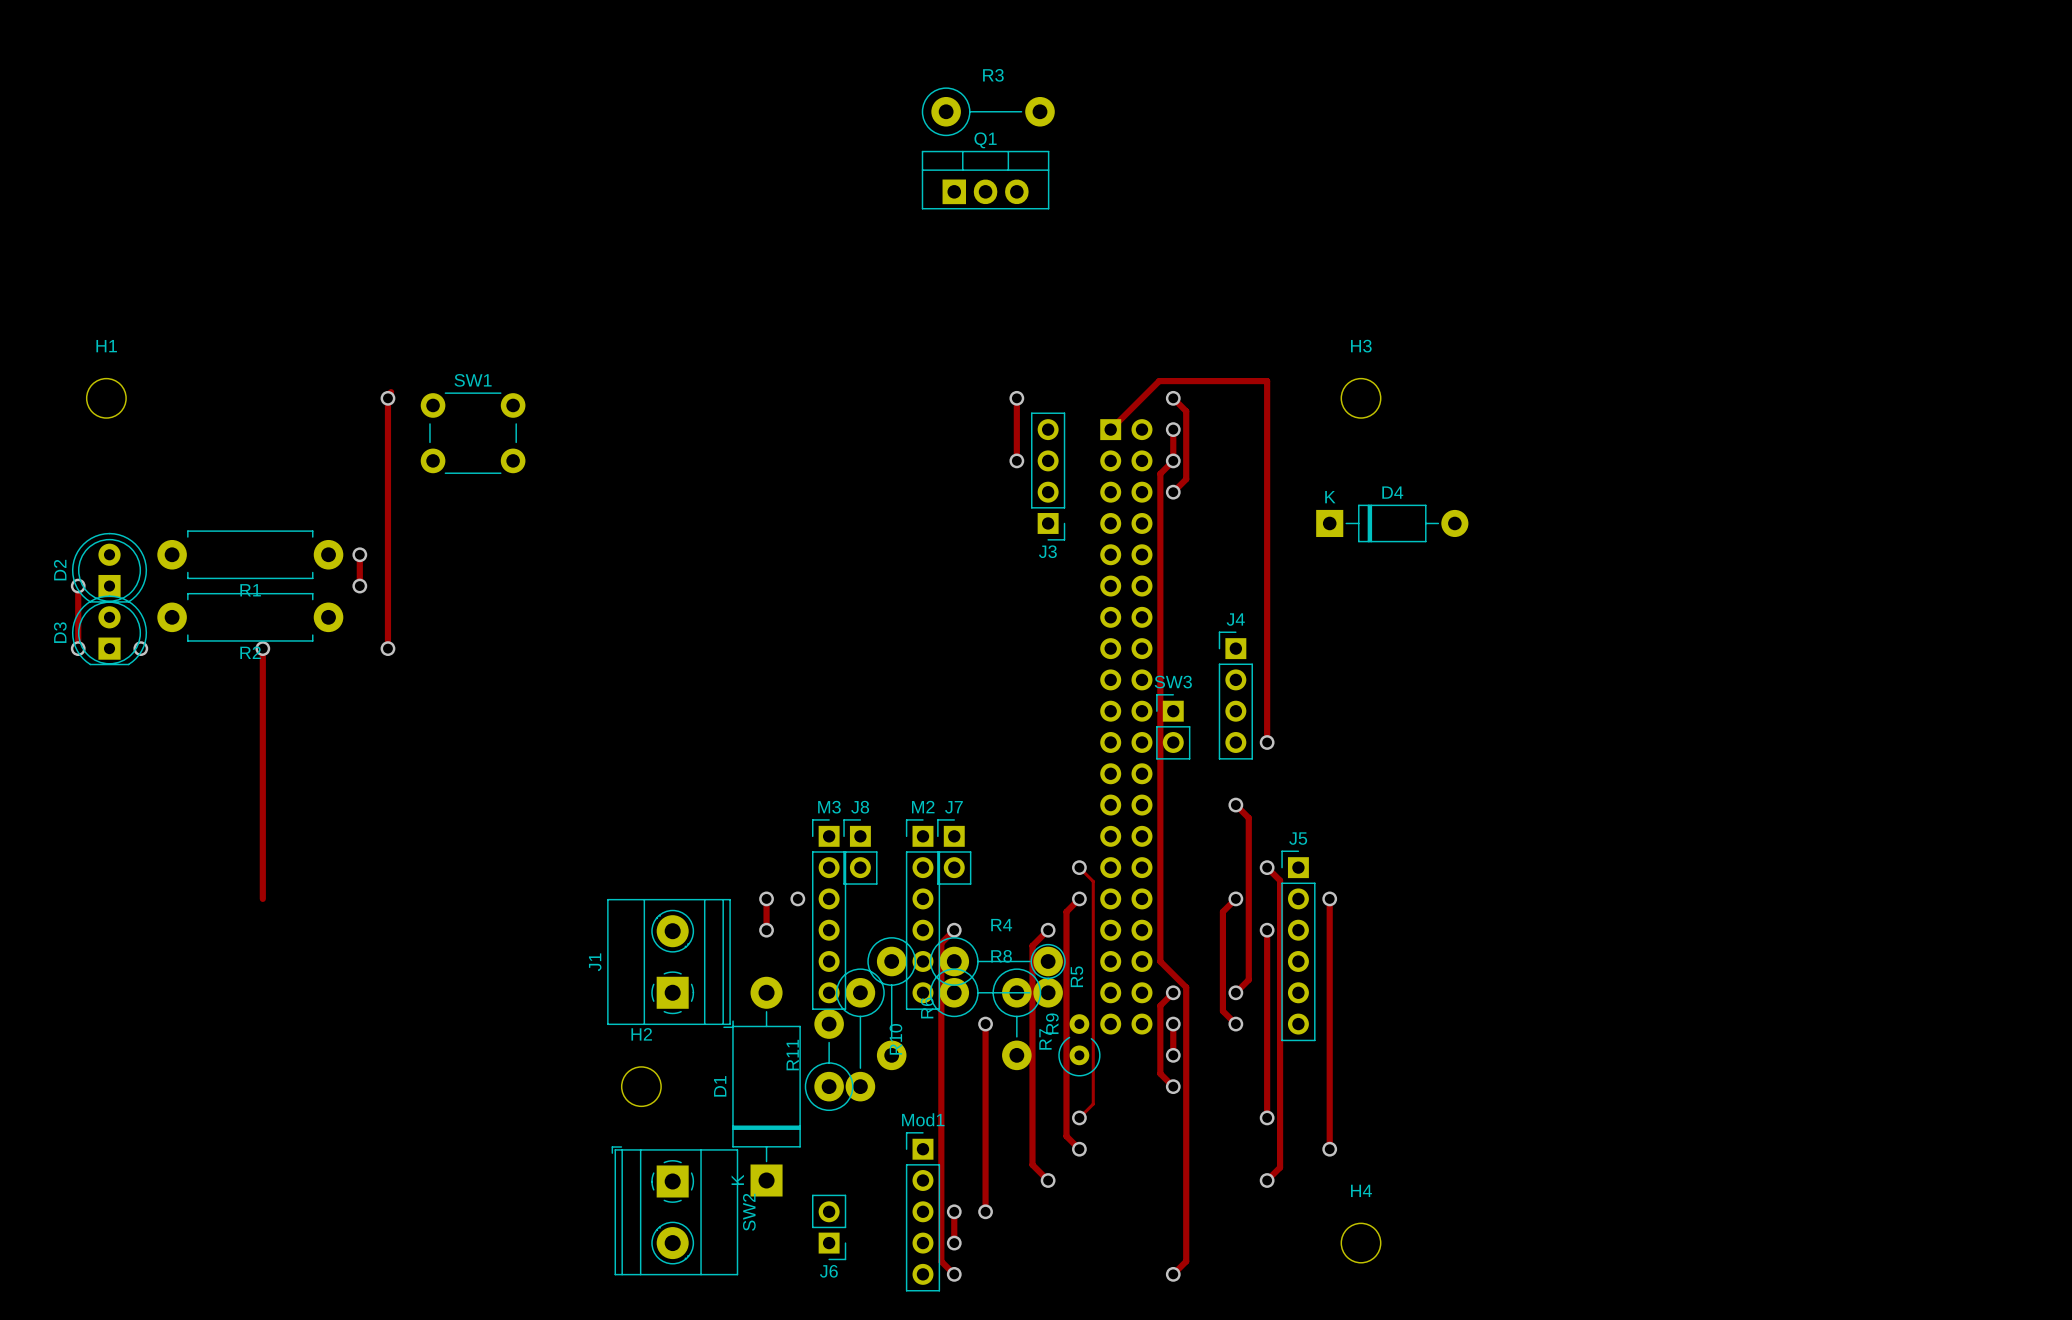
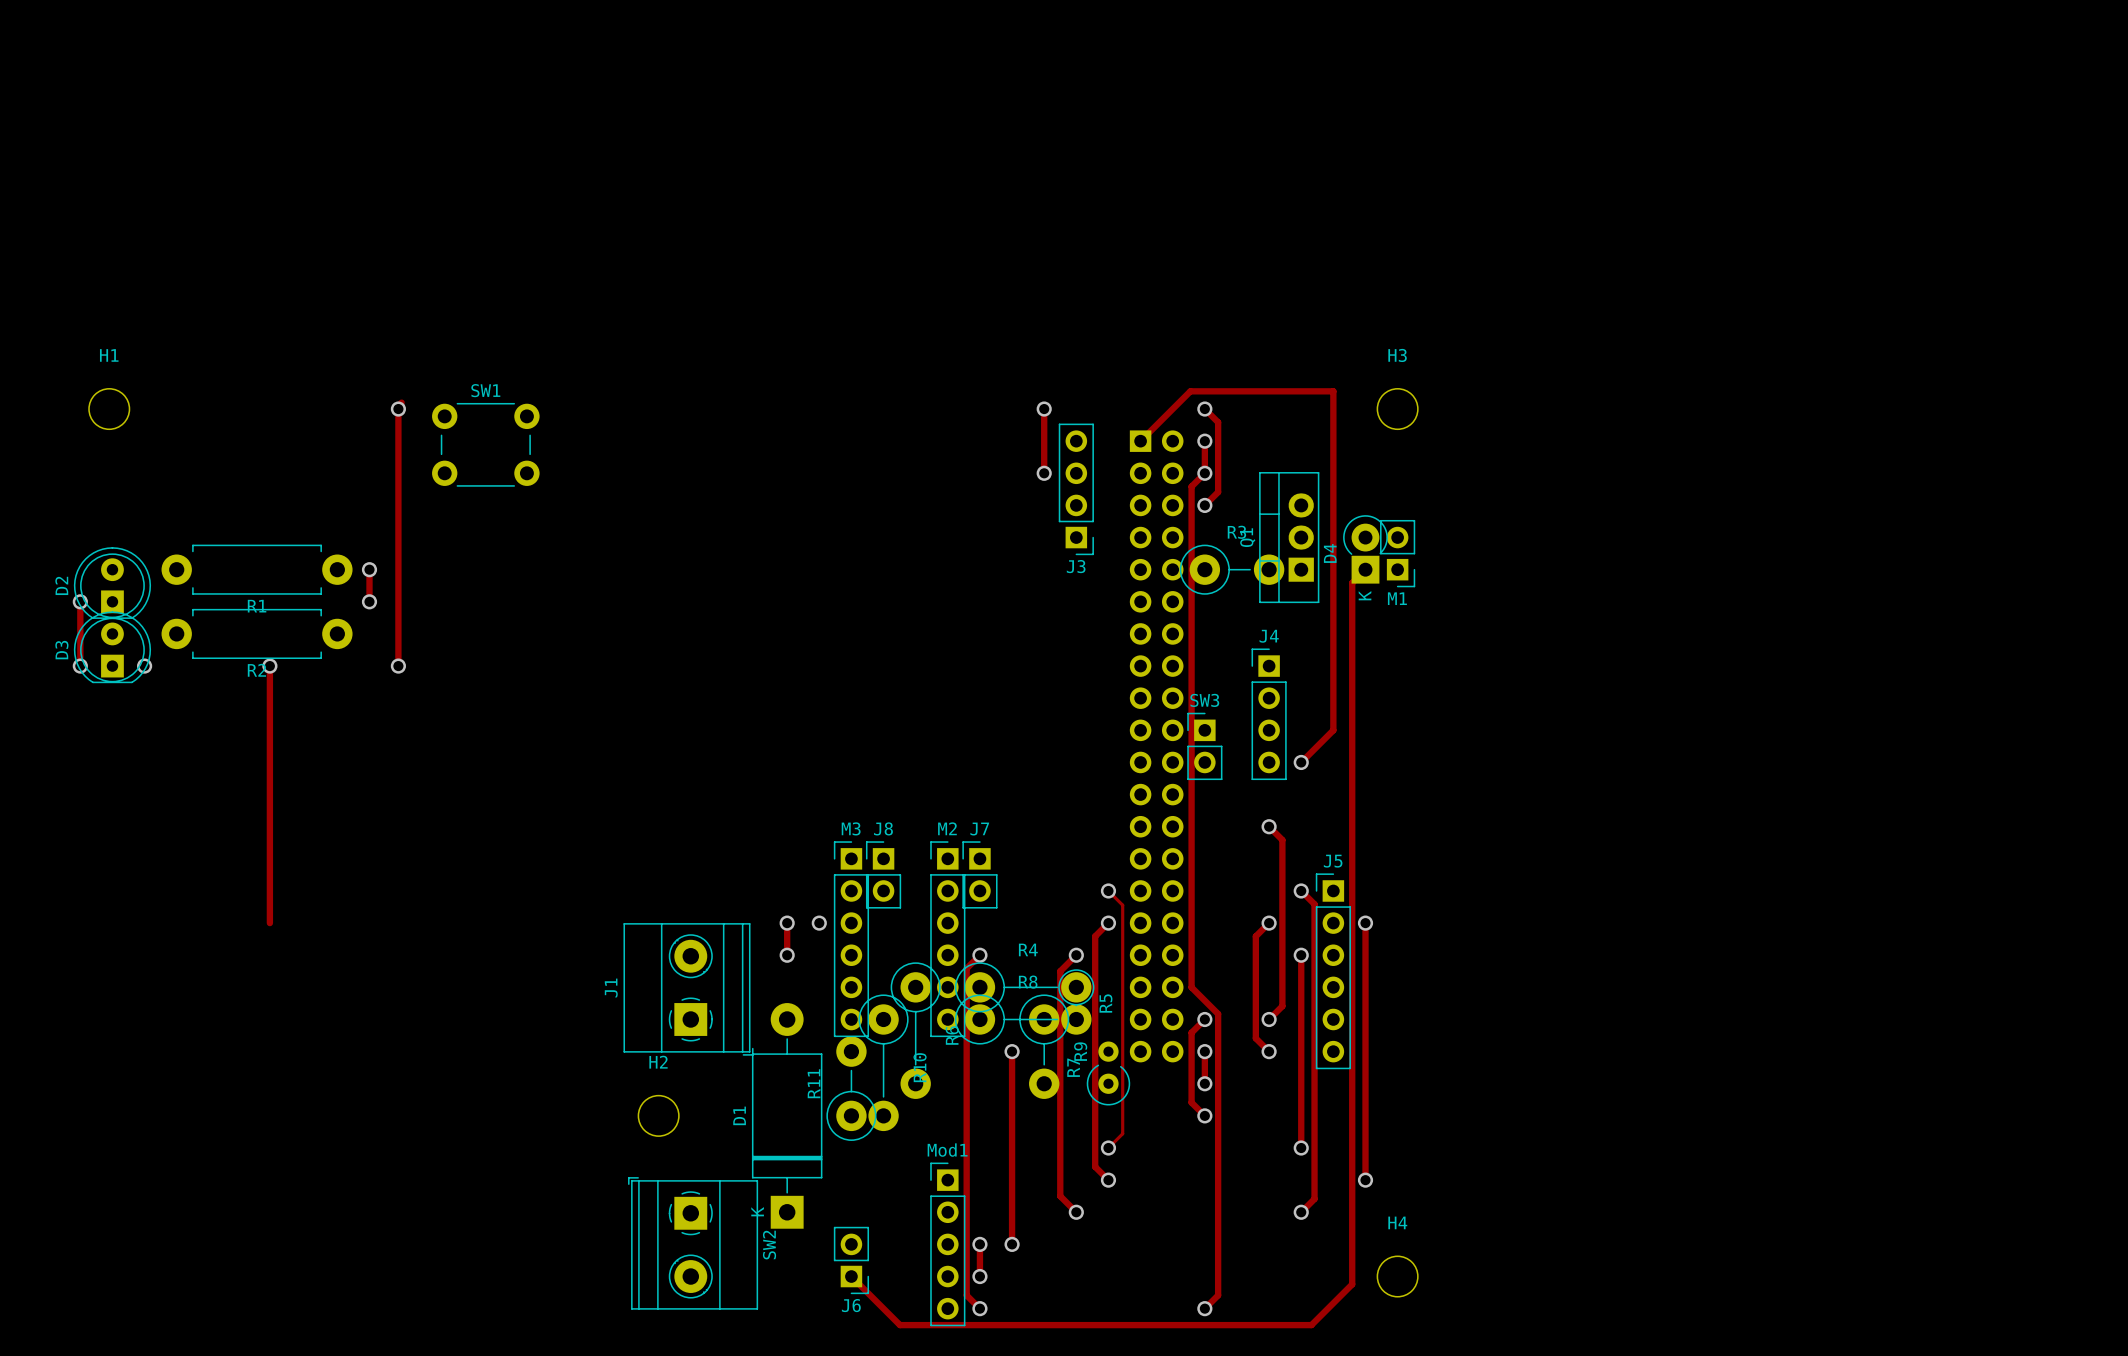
R3 footprint: [921, 87, 1055, 137] -> [1179, 544, 1285, 595]
Q1 rotation: 0° (985, 180) -> 90° counterclockwise (1289, 537)
Q1 position: (985, 180) -> (1289, 537)
track: (1267, 381) (1267, 742) -> (1301, 391) (1333, 391) (1333, 730) (1301, 762)
D4 name position: D4 (1392, 492) -> D4 (1330, 553)
D4 footprint: [1316, 504, 1469, 543] -> [1343, 515, 1388, 584]
M1: none -> (1397, 553)
track: none -> (1365, 569) (1352, 582) (1352, 1284) (1311, 1325) (900, 1325) (851, 1276)

